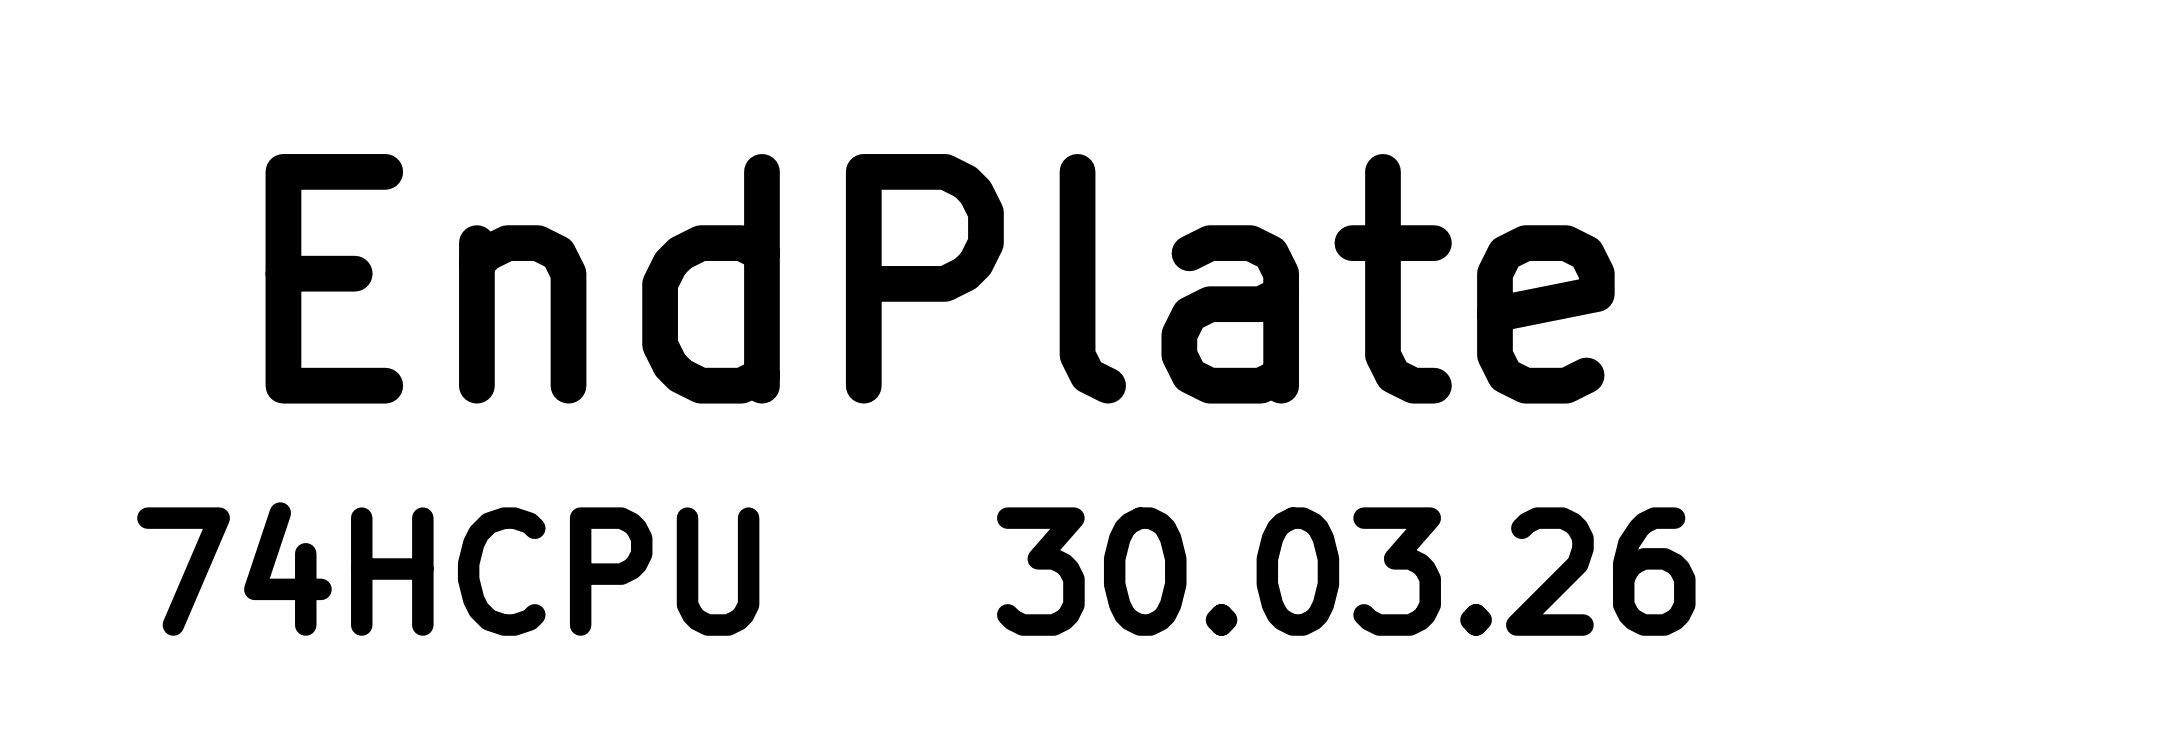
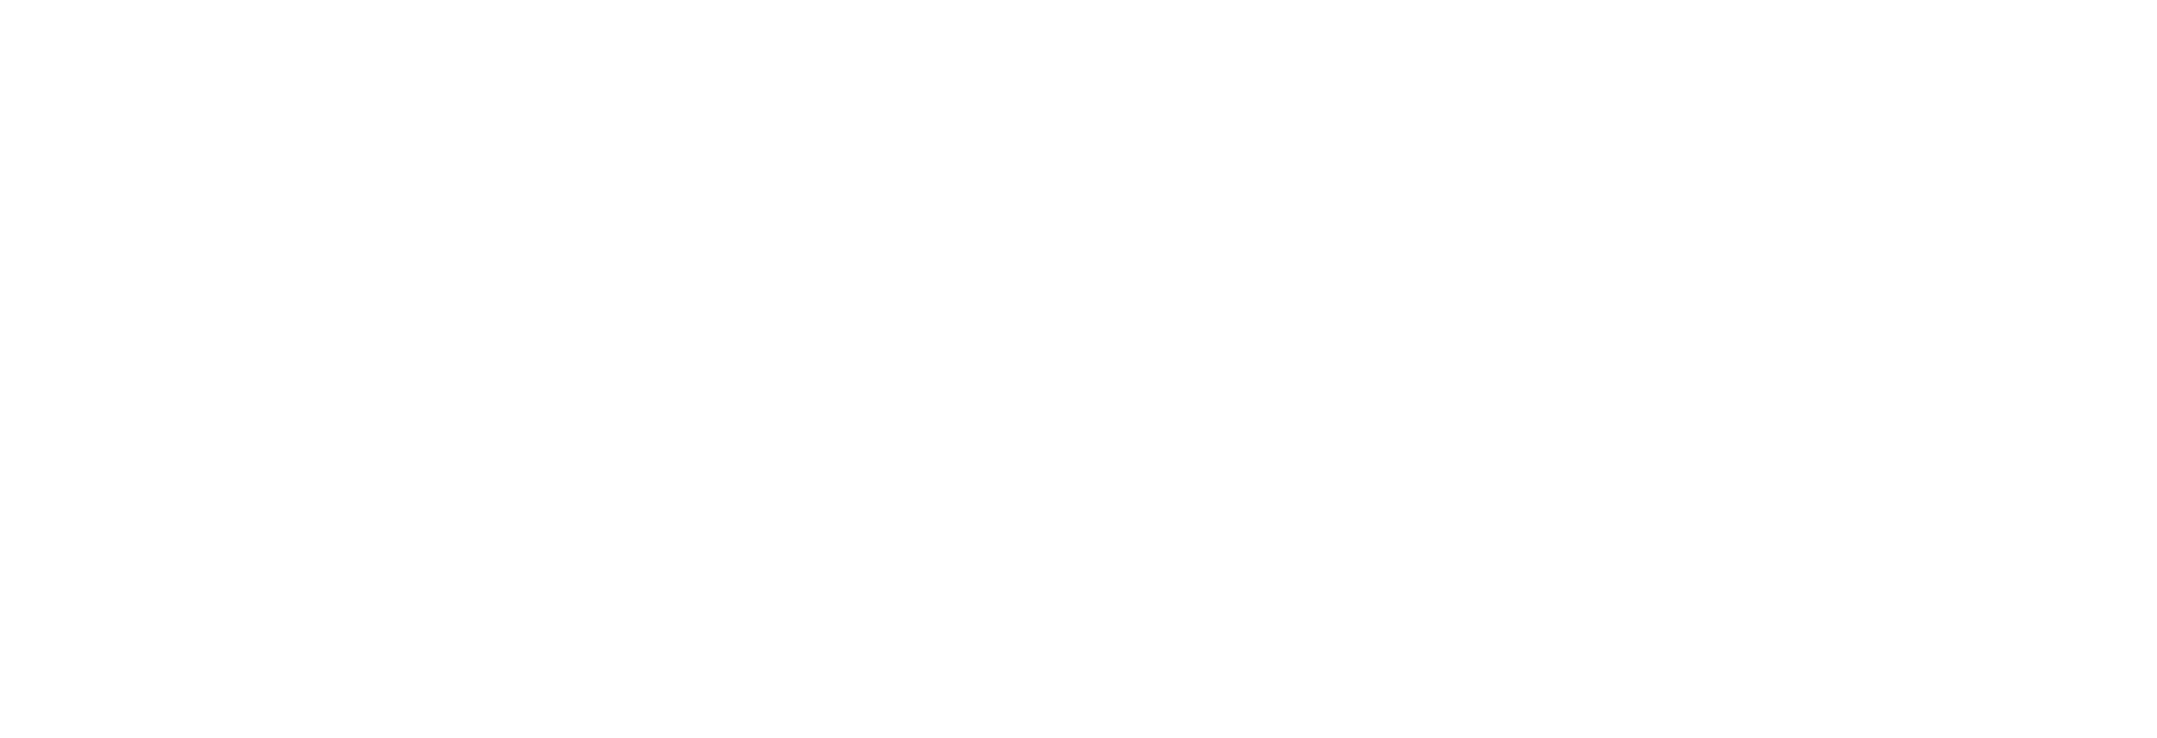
text: EndPlate (940, 278) -> none
text: 74HCPU (448, 569) -> none
text: 30.03.26 (1346, 571) -> none

